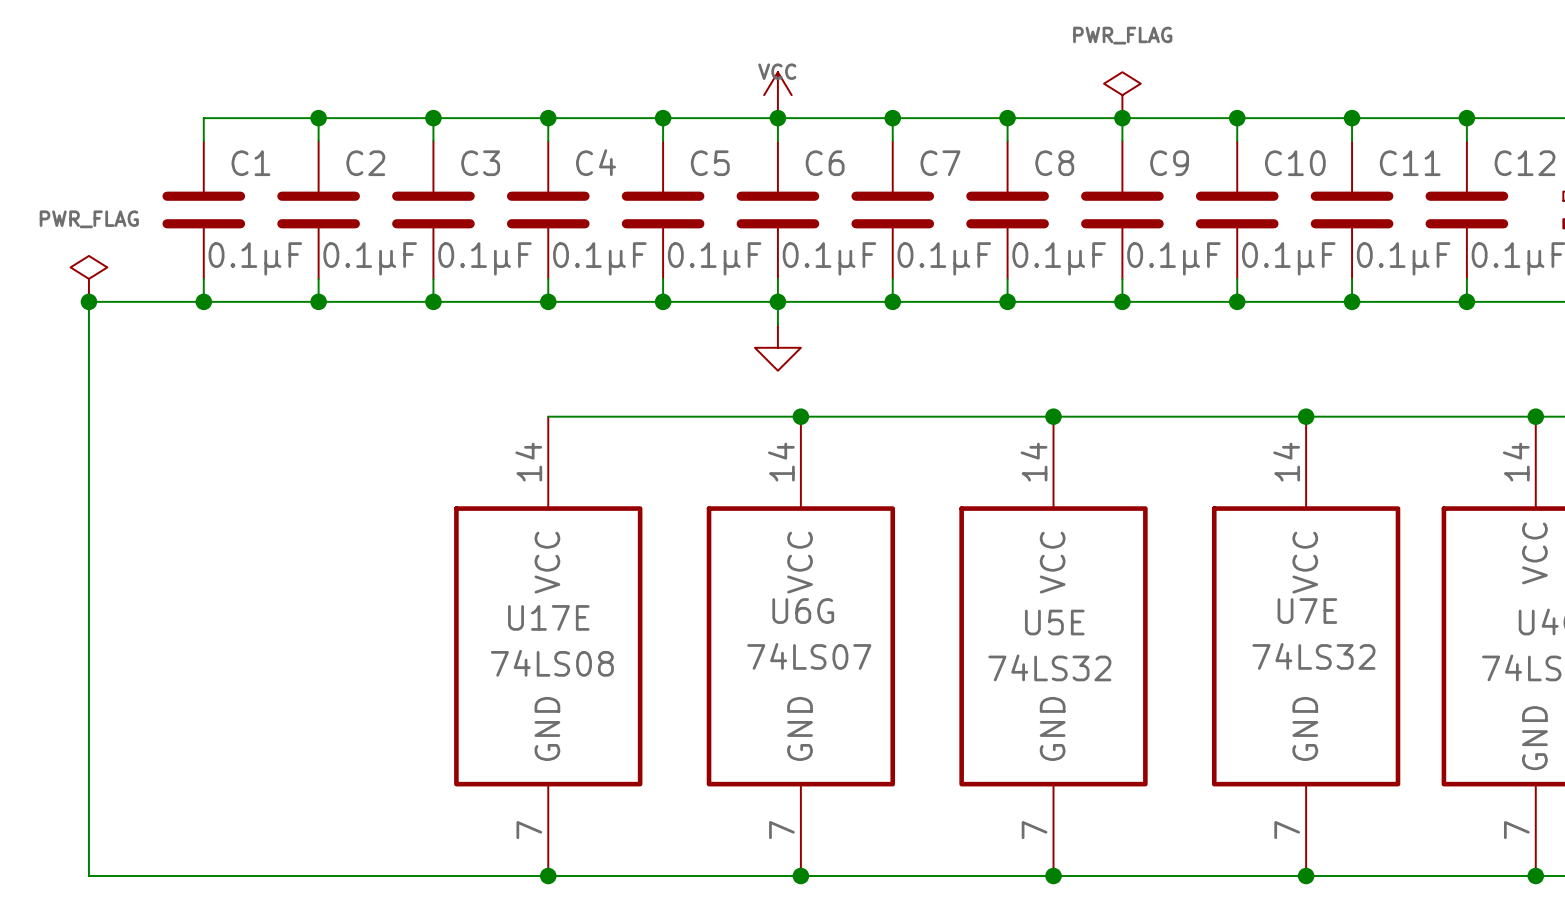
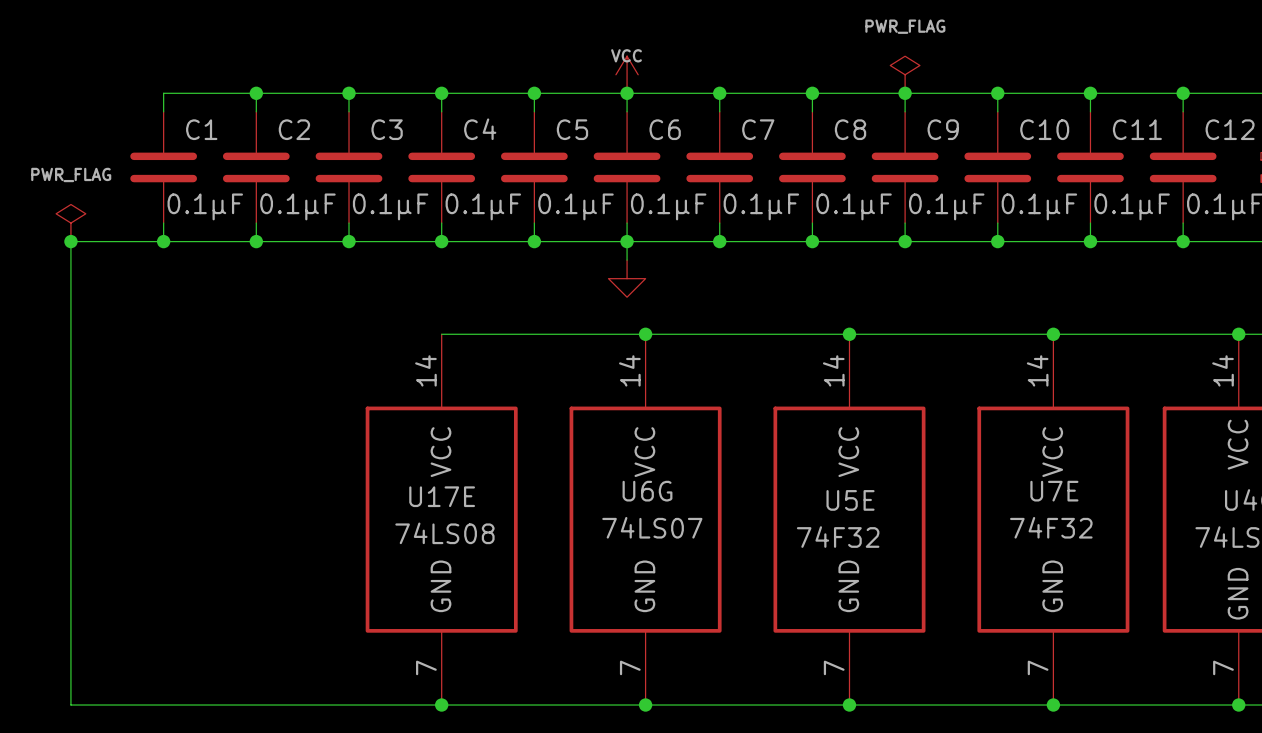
U7E value: 74LS32 (1313, 656) -> 74F32 (1051, 527)
U5E value: 74LS32 (1049, 667) -> 74F32 (838, 537)

